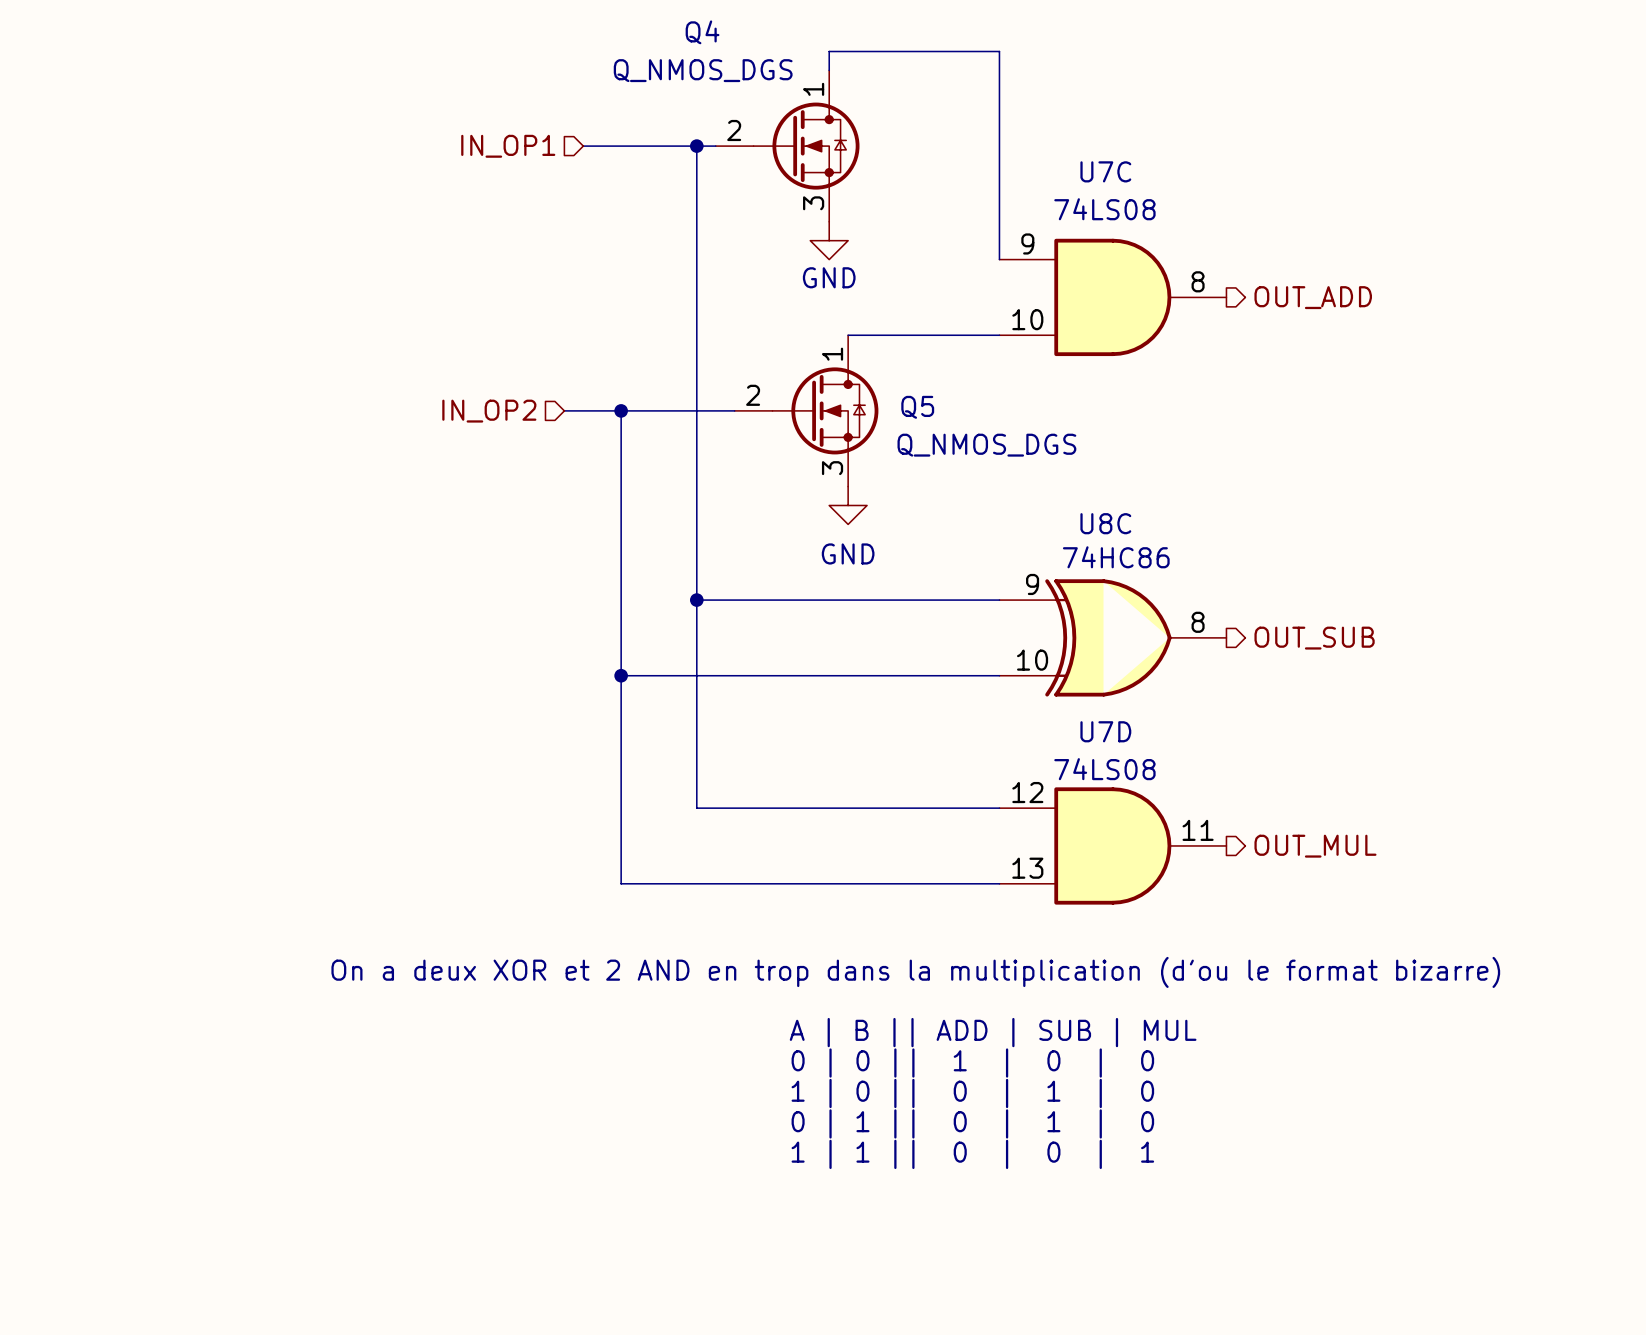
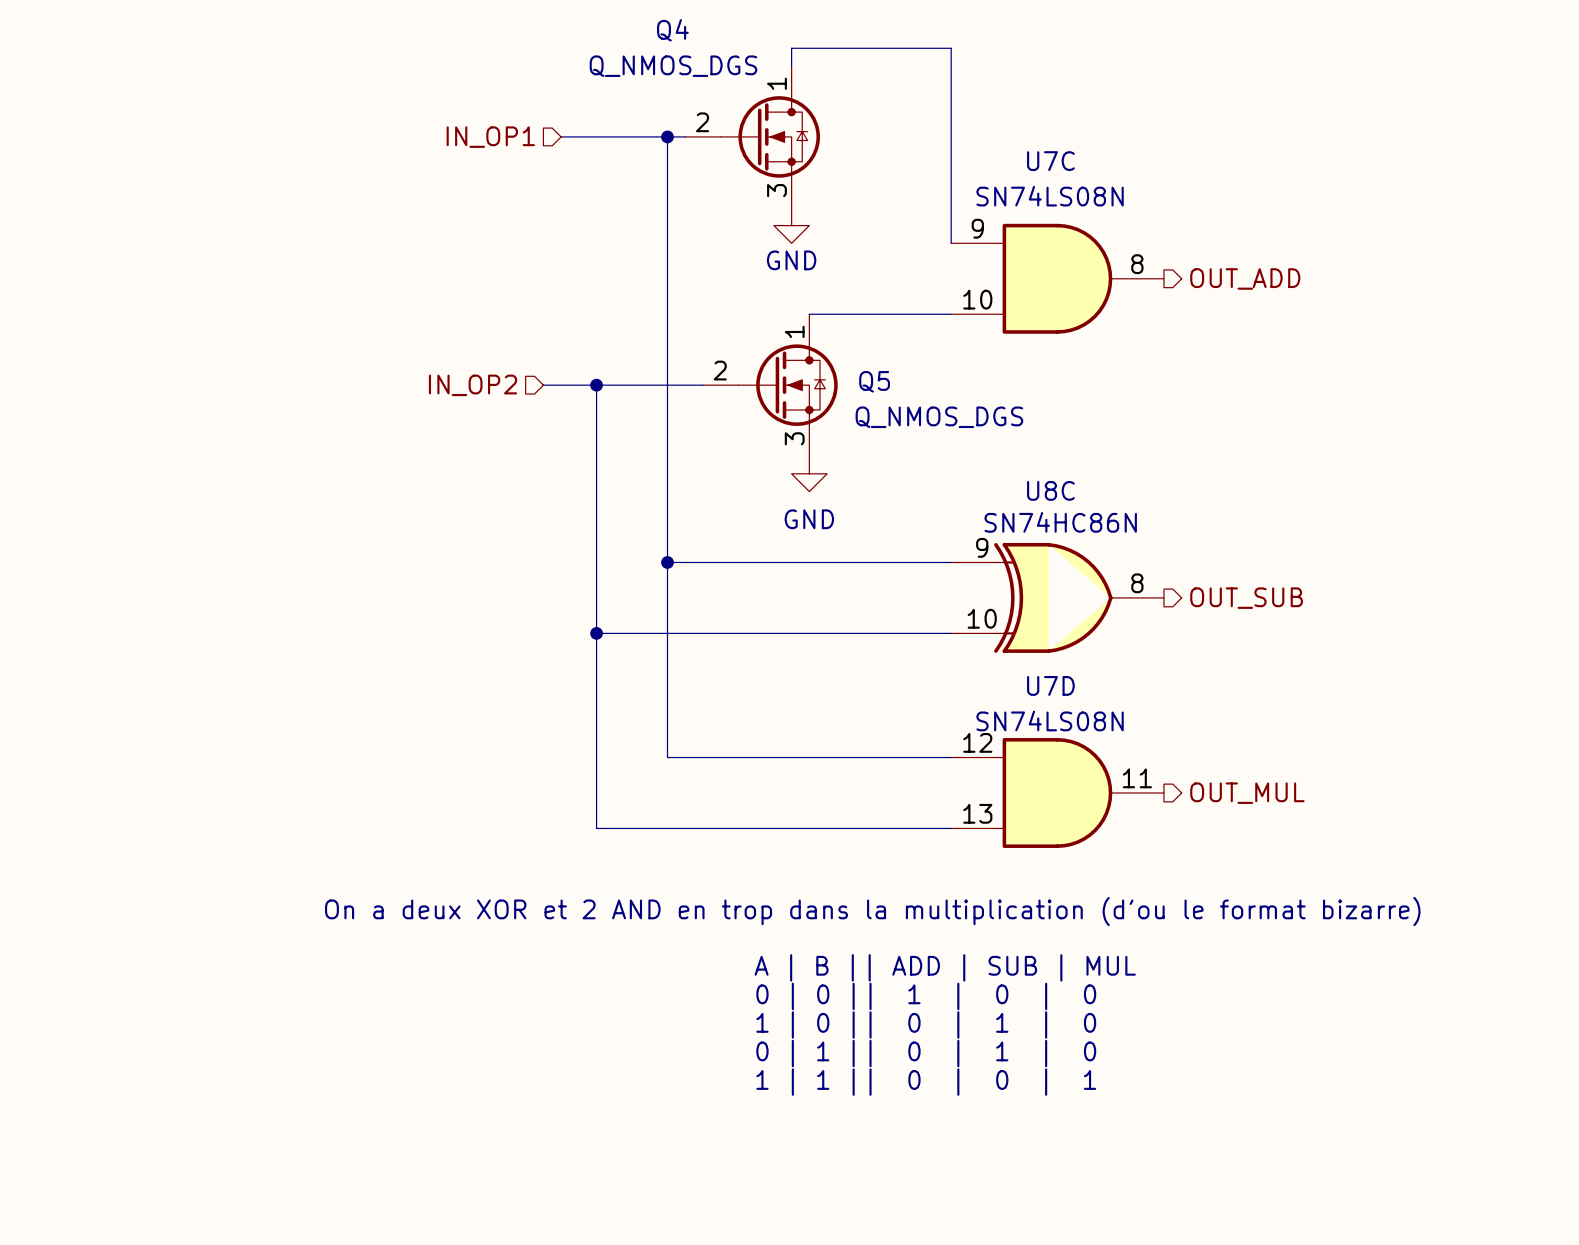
U7C value: 74LS08 (1104, 209) -> SN74LS08N (1050, 196)
U8C value: 74HC86 (1116, 557) -> SN74HC86N (1060, 522)
U7D value: 74LS08 (1104, 769) -> SN74LS08N (1050, 720)

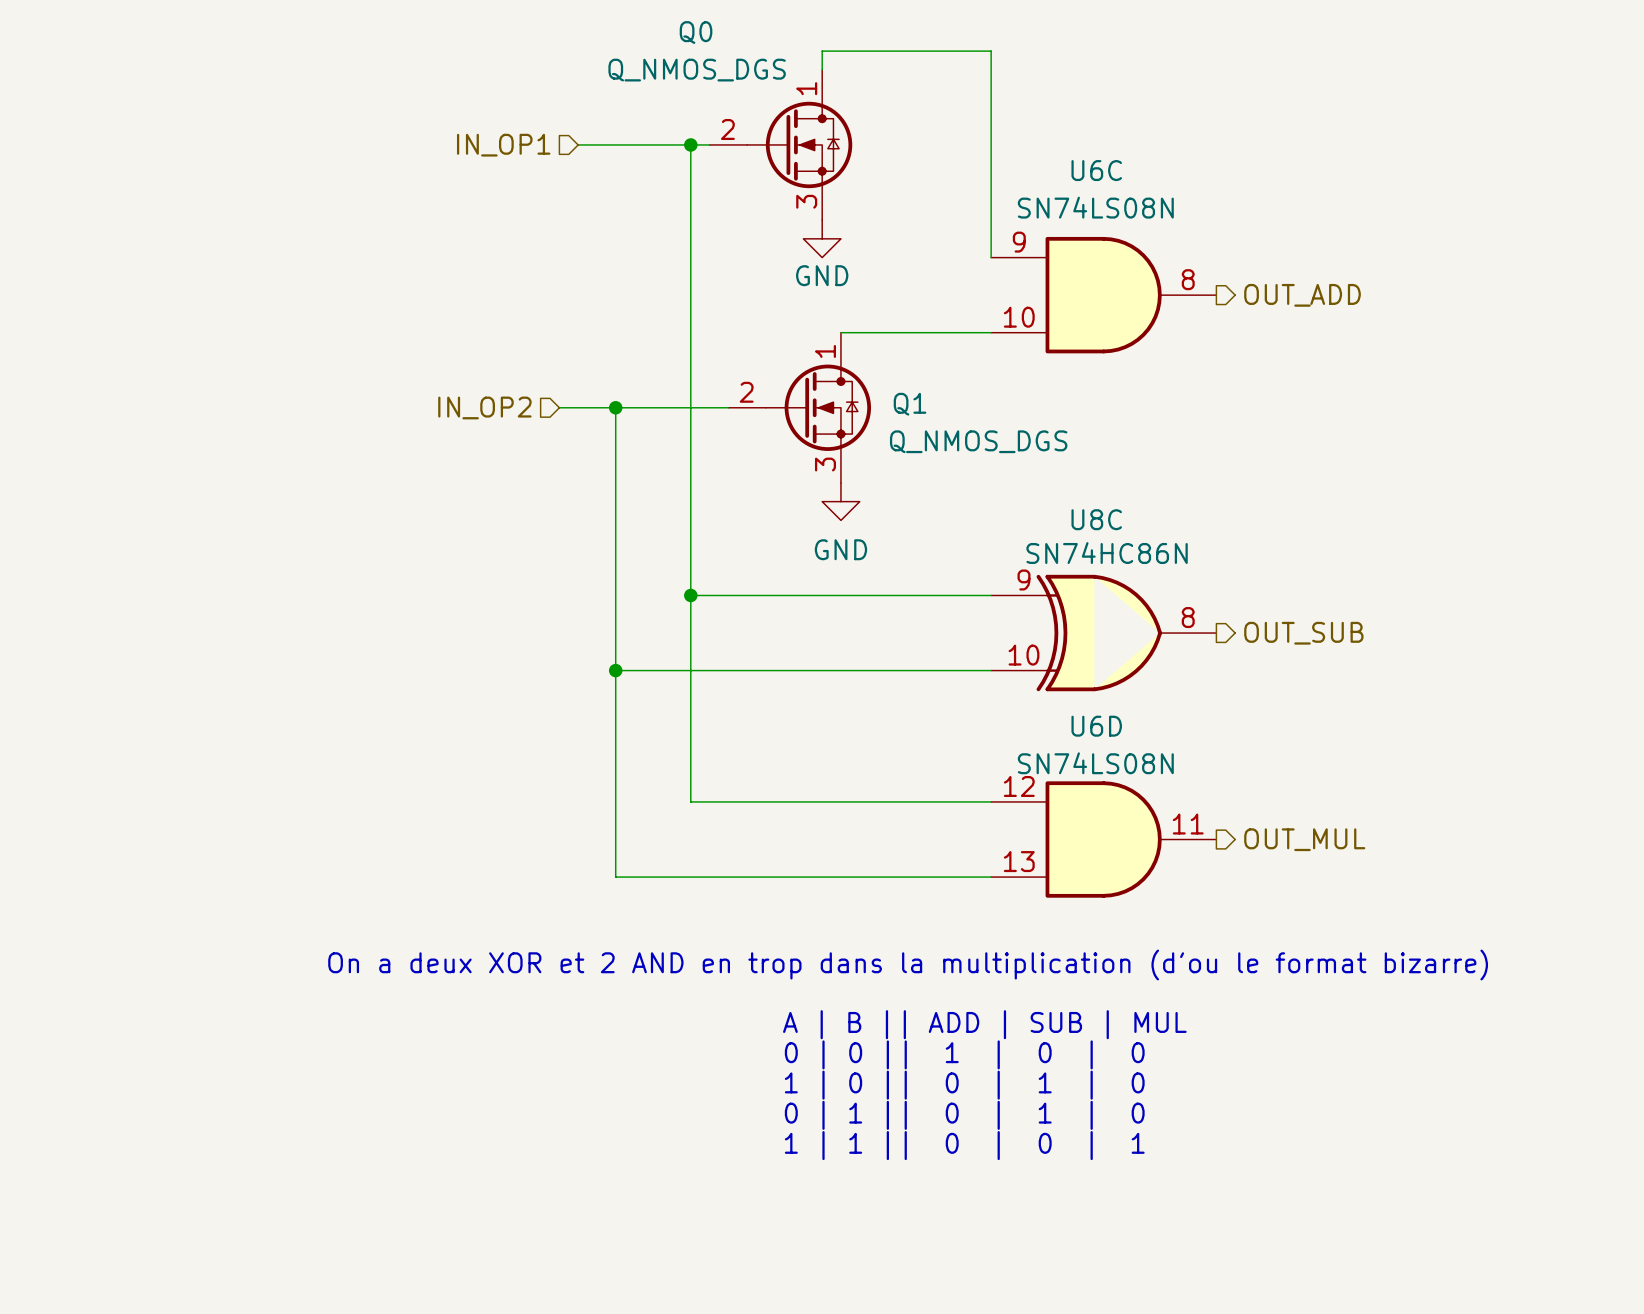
Q4 name: Q4 (672, 30) -> Q0 (696, 32)
U7C name: U7C (1050, 161) -> U6C (1096, 170)
Q5 name: Q5 (874, 381) -> Q1 (910, 404)
U7D name: U7D (1050, 685) -> U6D (1096, 726)

